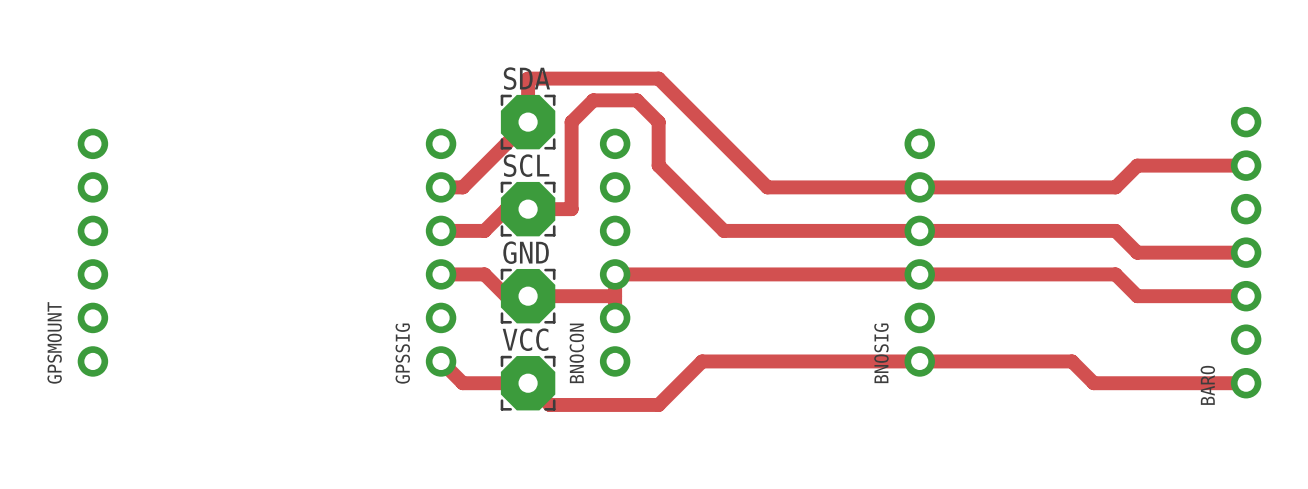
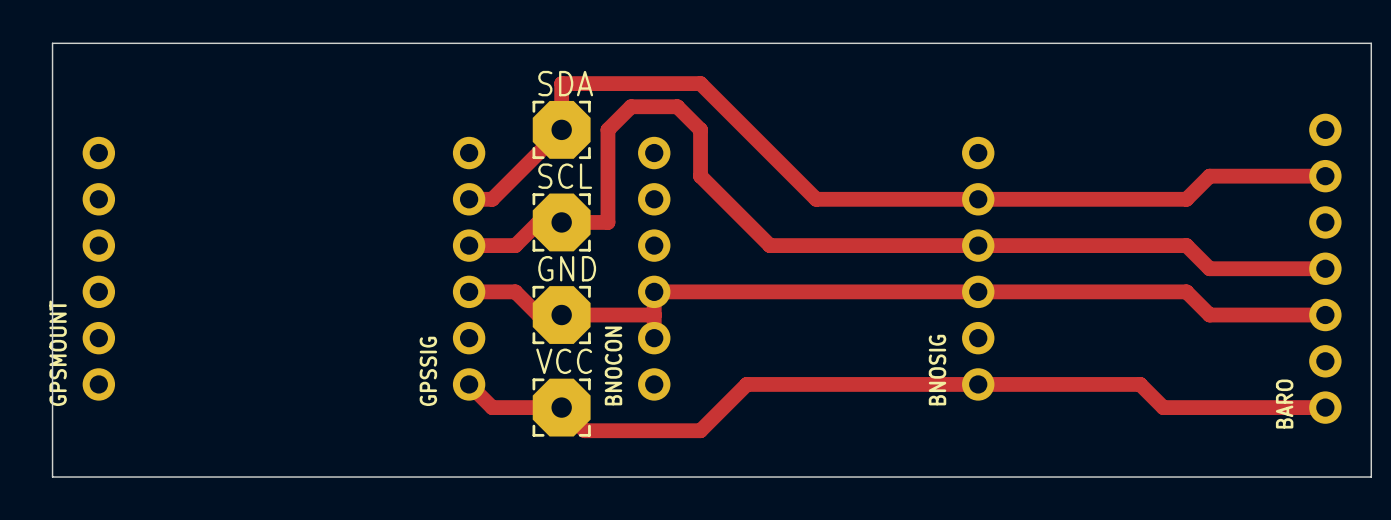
board edge: none -> (52, 43) (1371, 43) (1371, 477) (52, 477) (52, 43)

